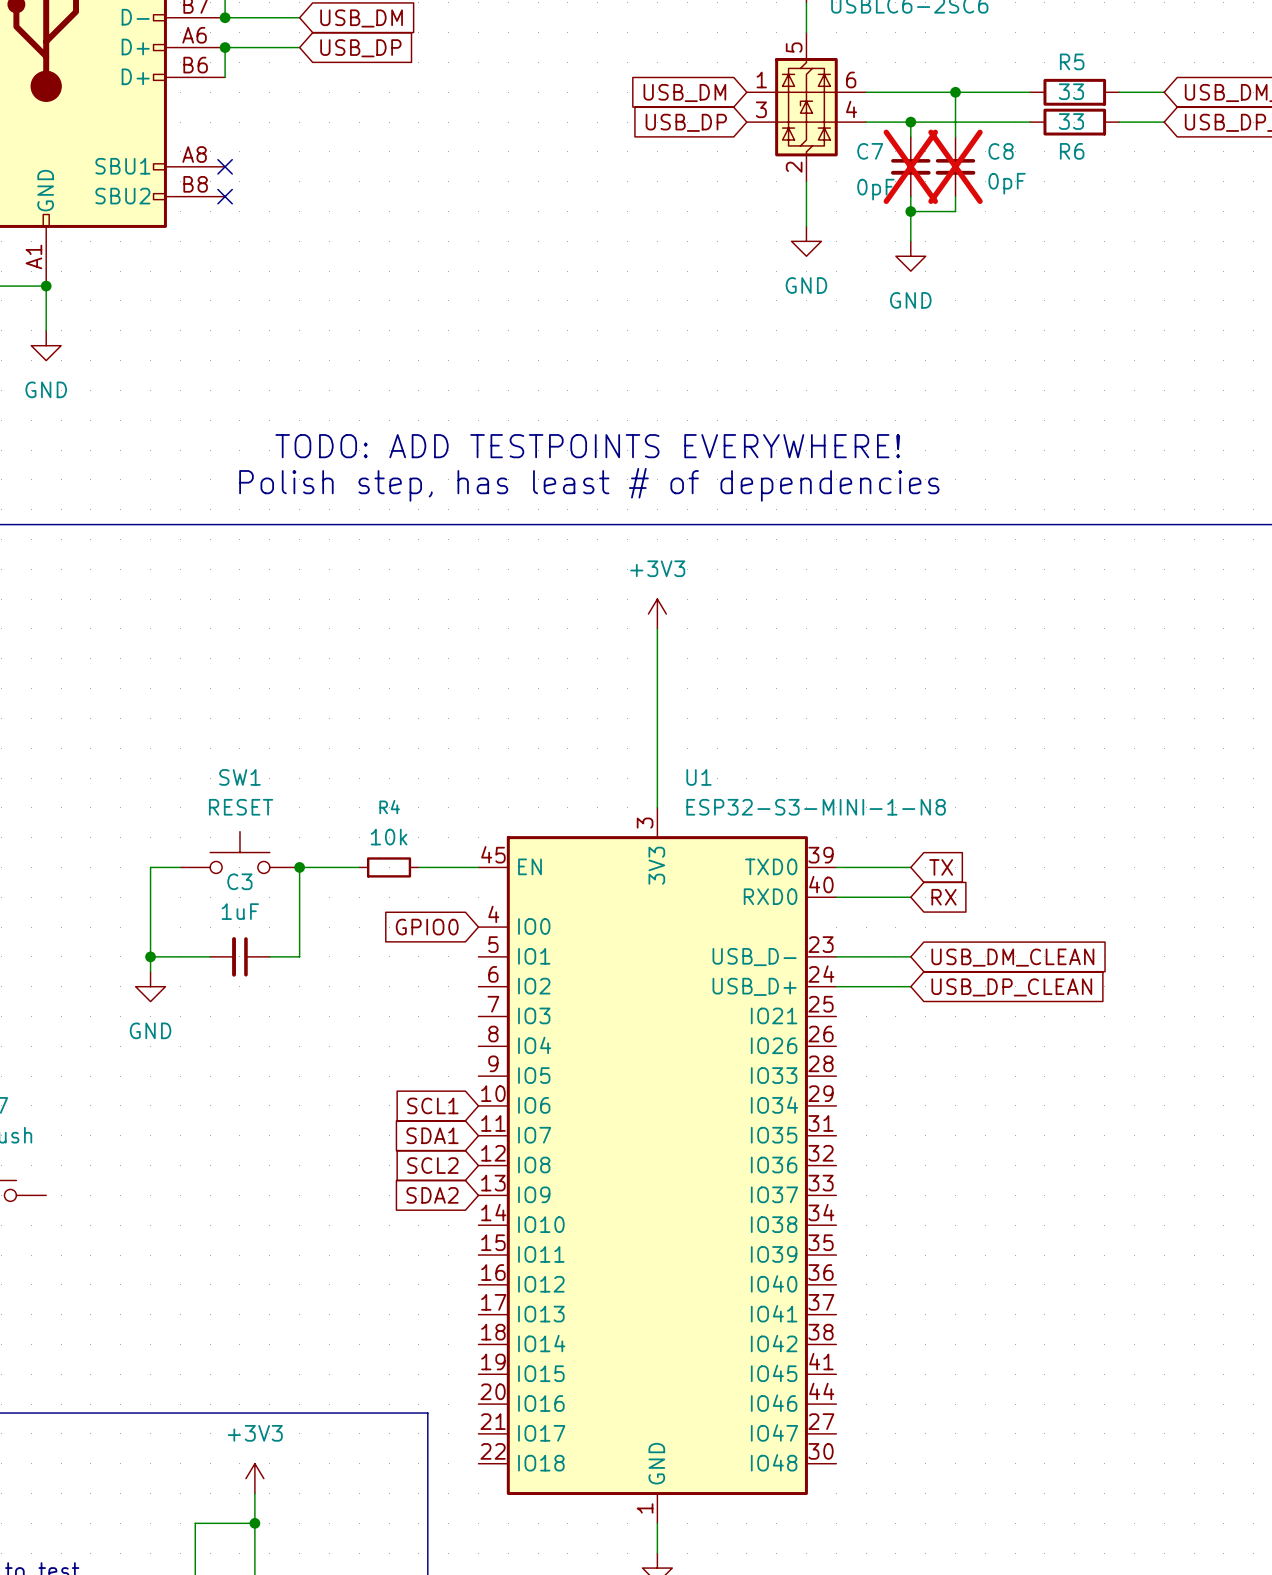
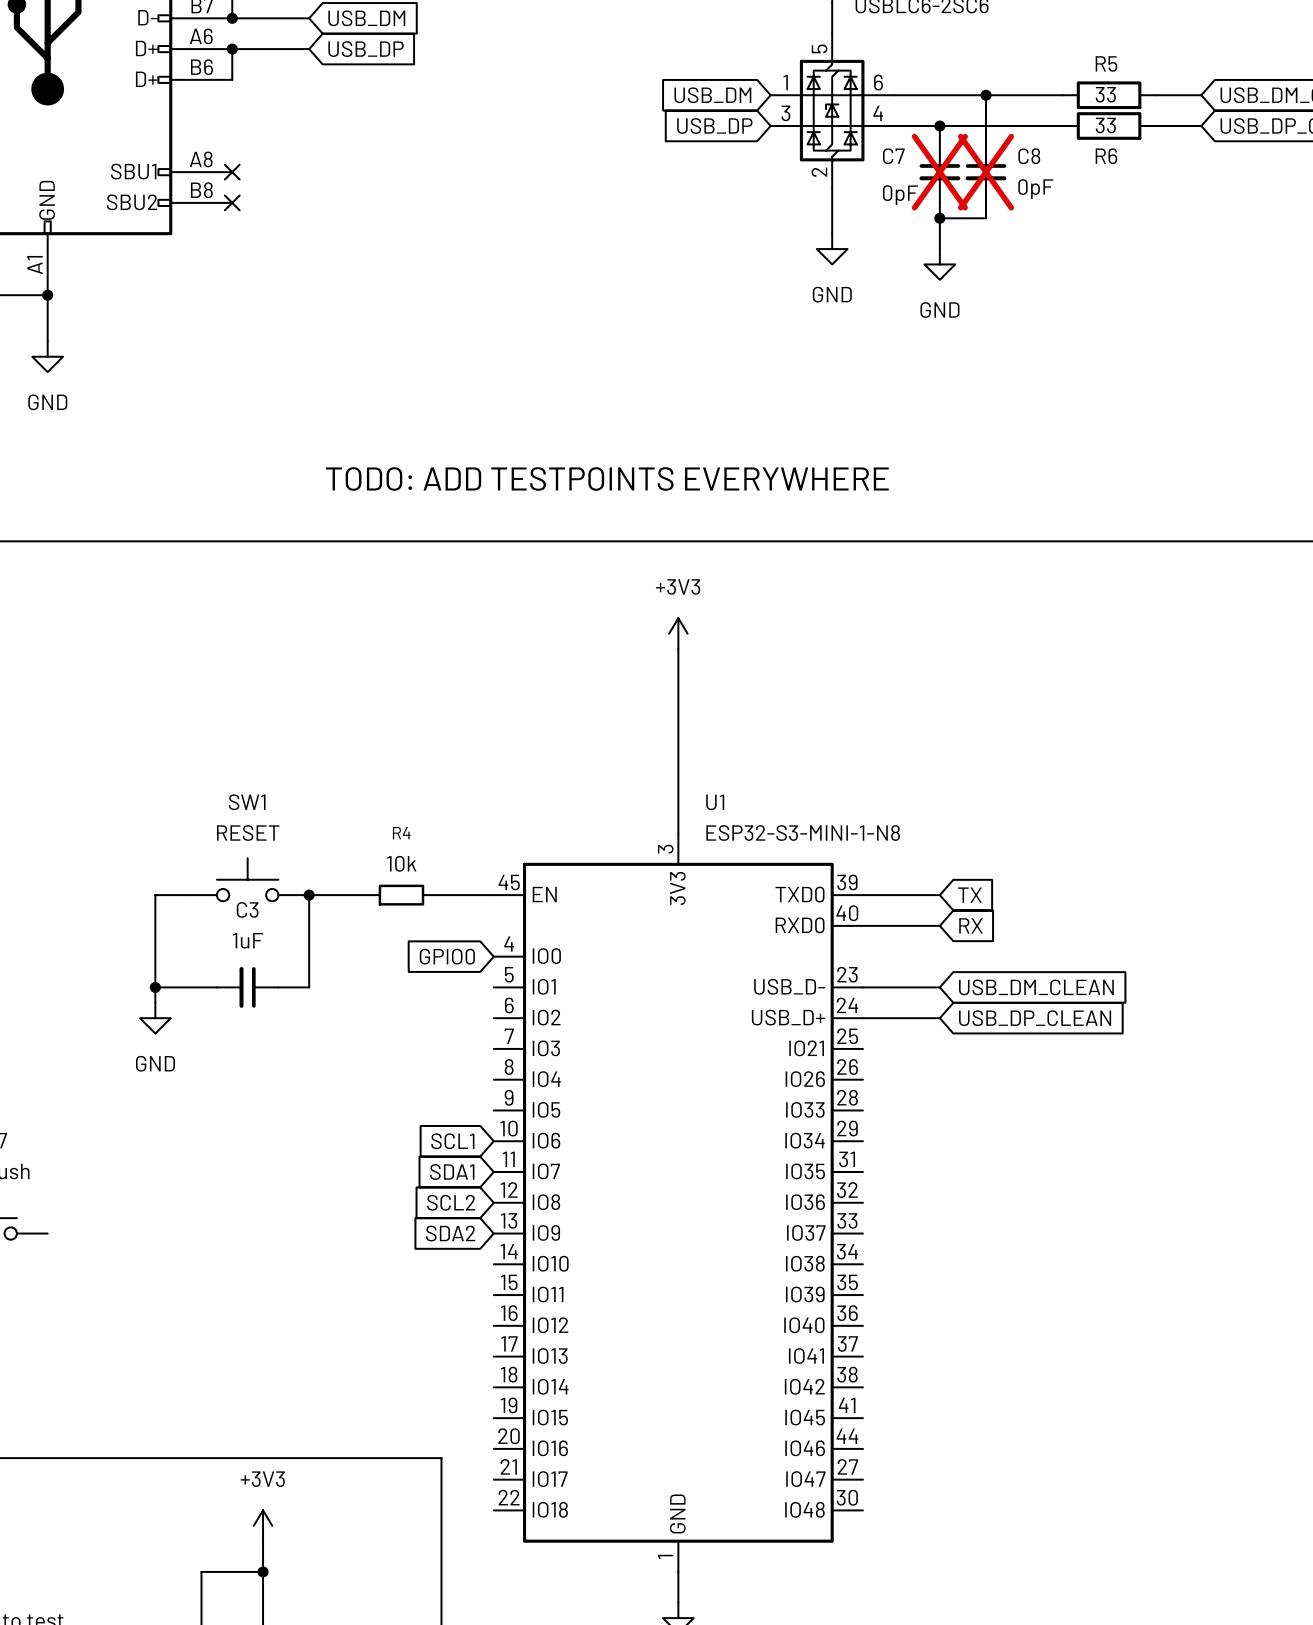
text: TODO: ADD TESTPOINTS EVERYWHERE! (587, 446) -> TODO: ADD TESTPOINTS EVERYWHERE (607, 478)
text: Polish step, has least # of dependencies (589, 484) -> none

